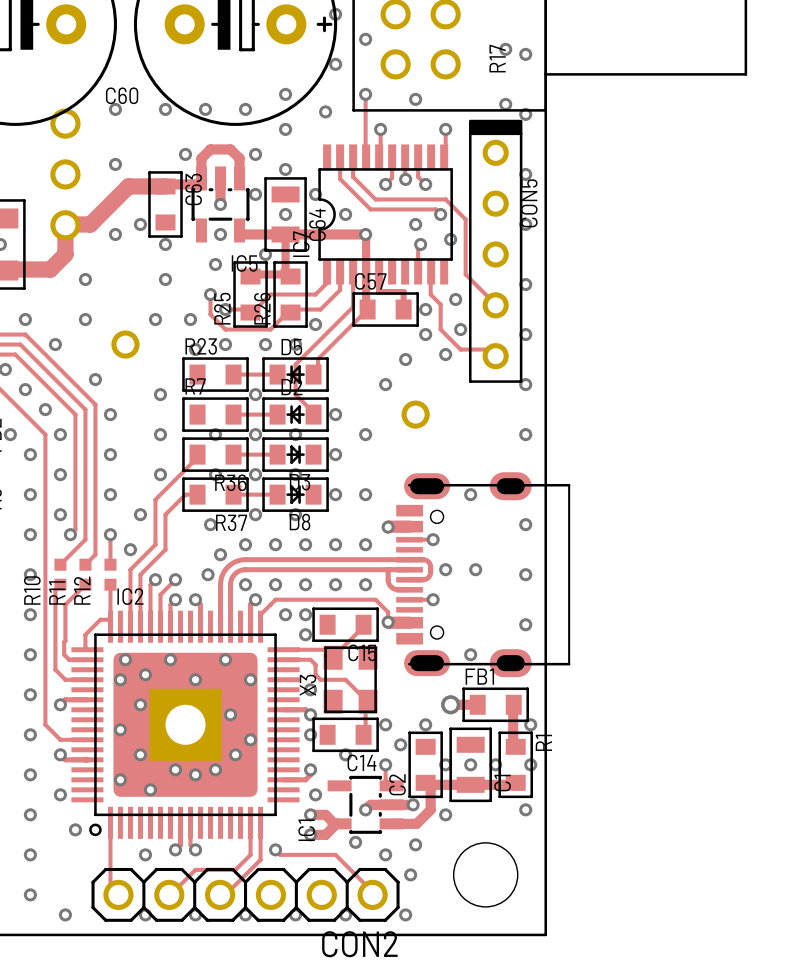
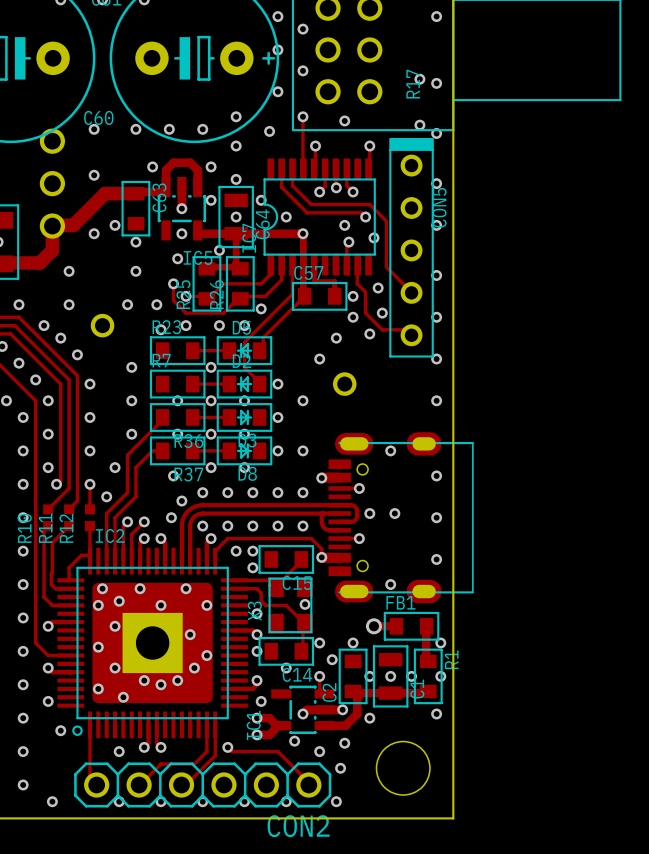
via: none -> (60, 338)
via: none -> (305, 604)

